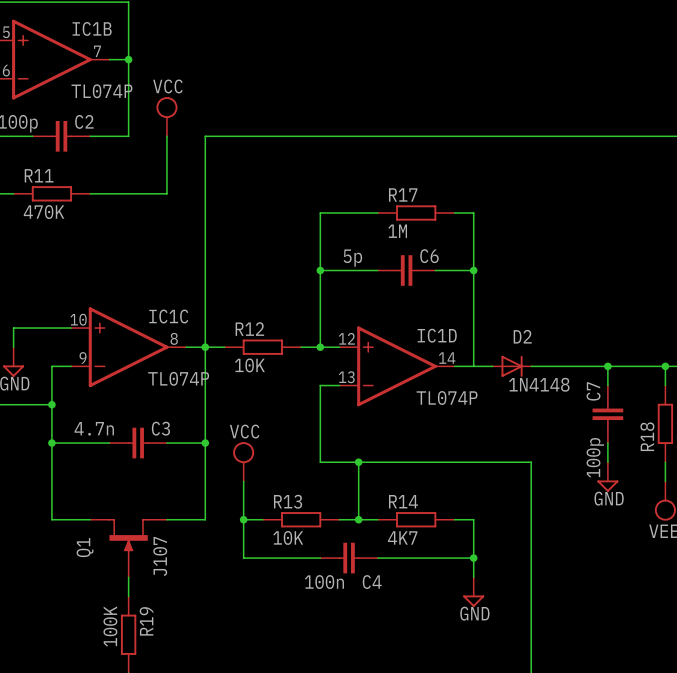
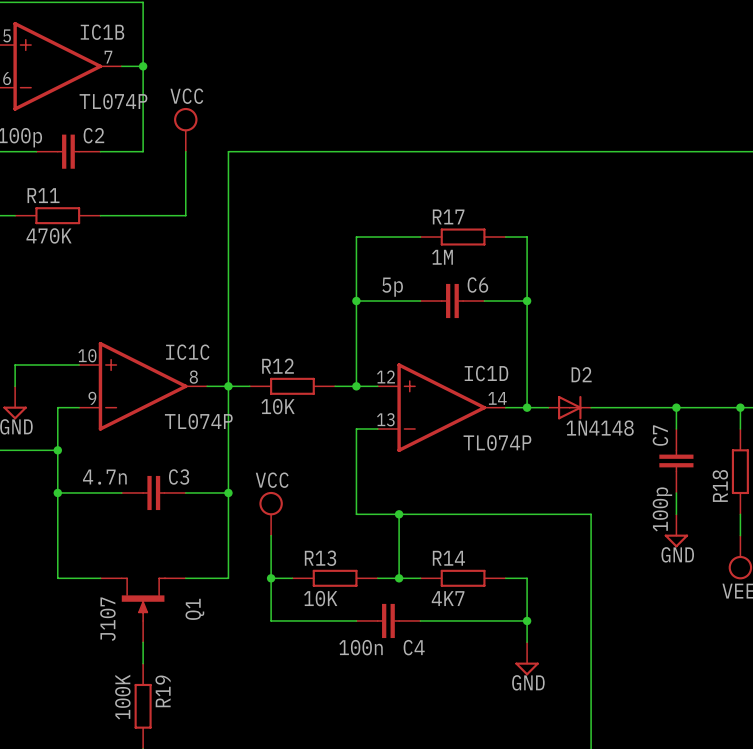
junction: none -> (527, 407)
Q1 flip: as is (128, 538) -> left-right (143, 599)

